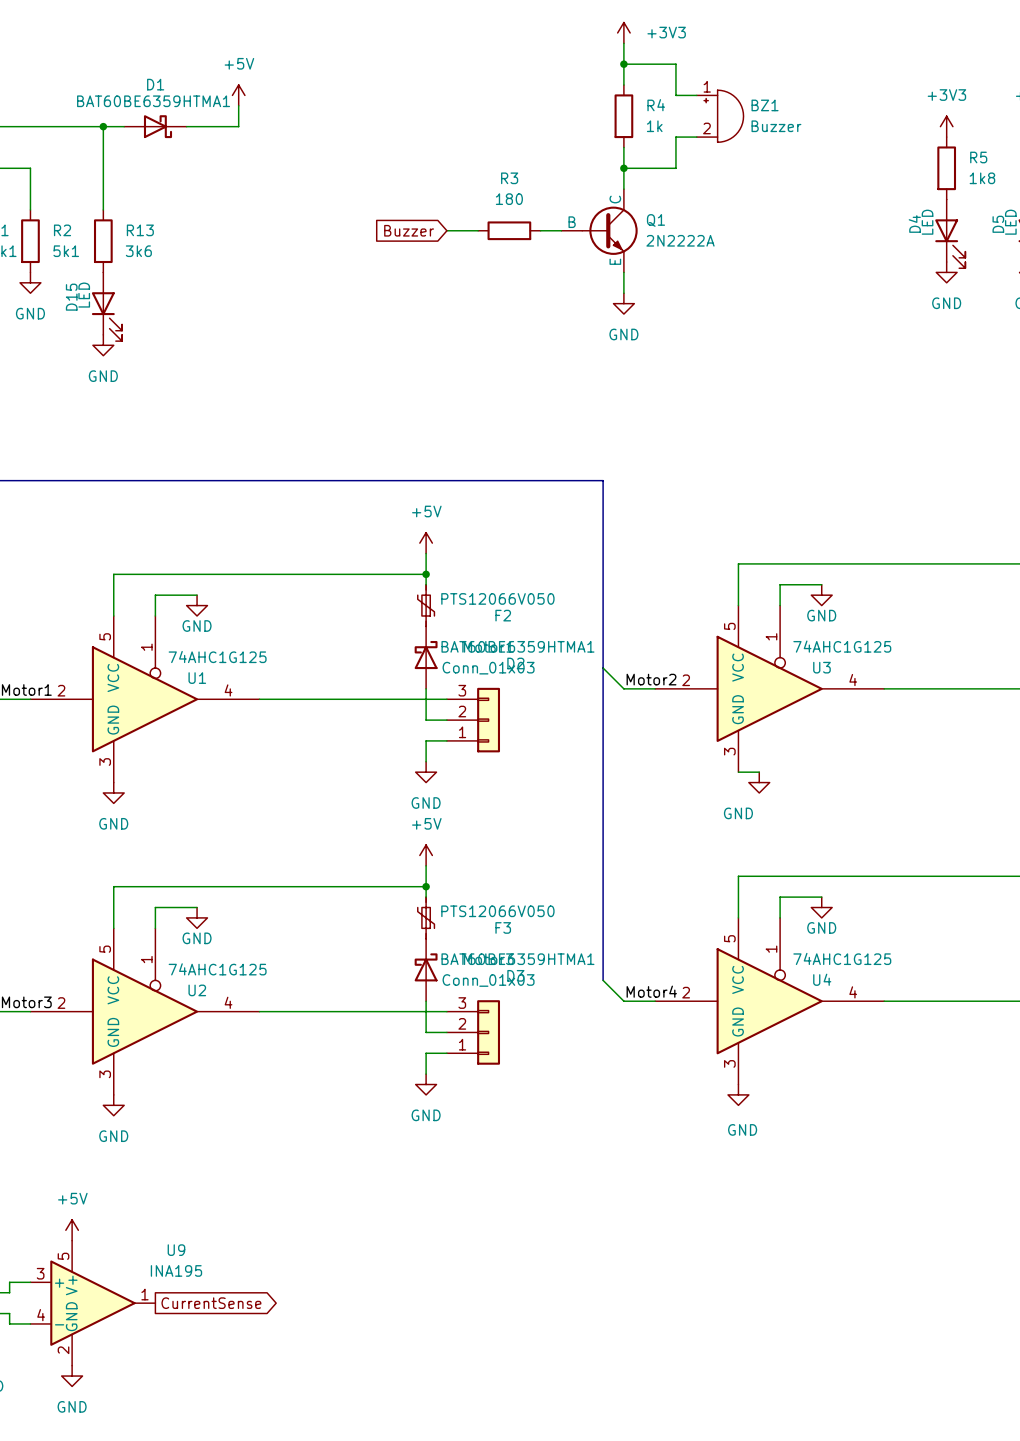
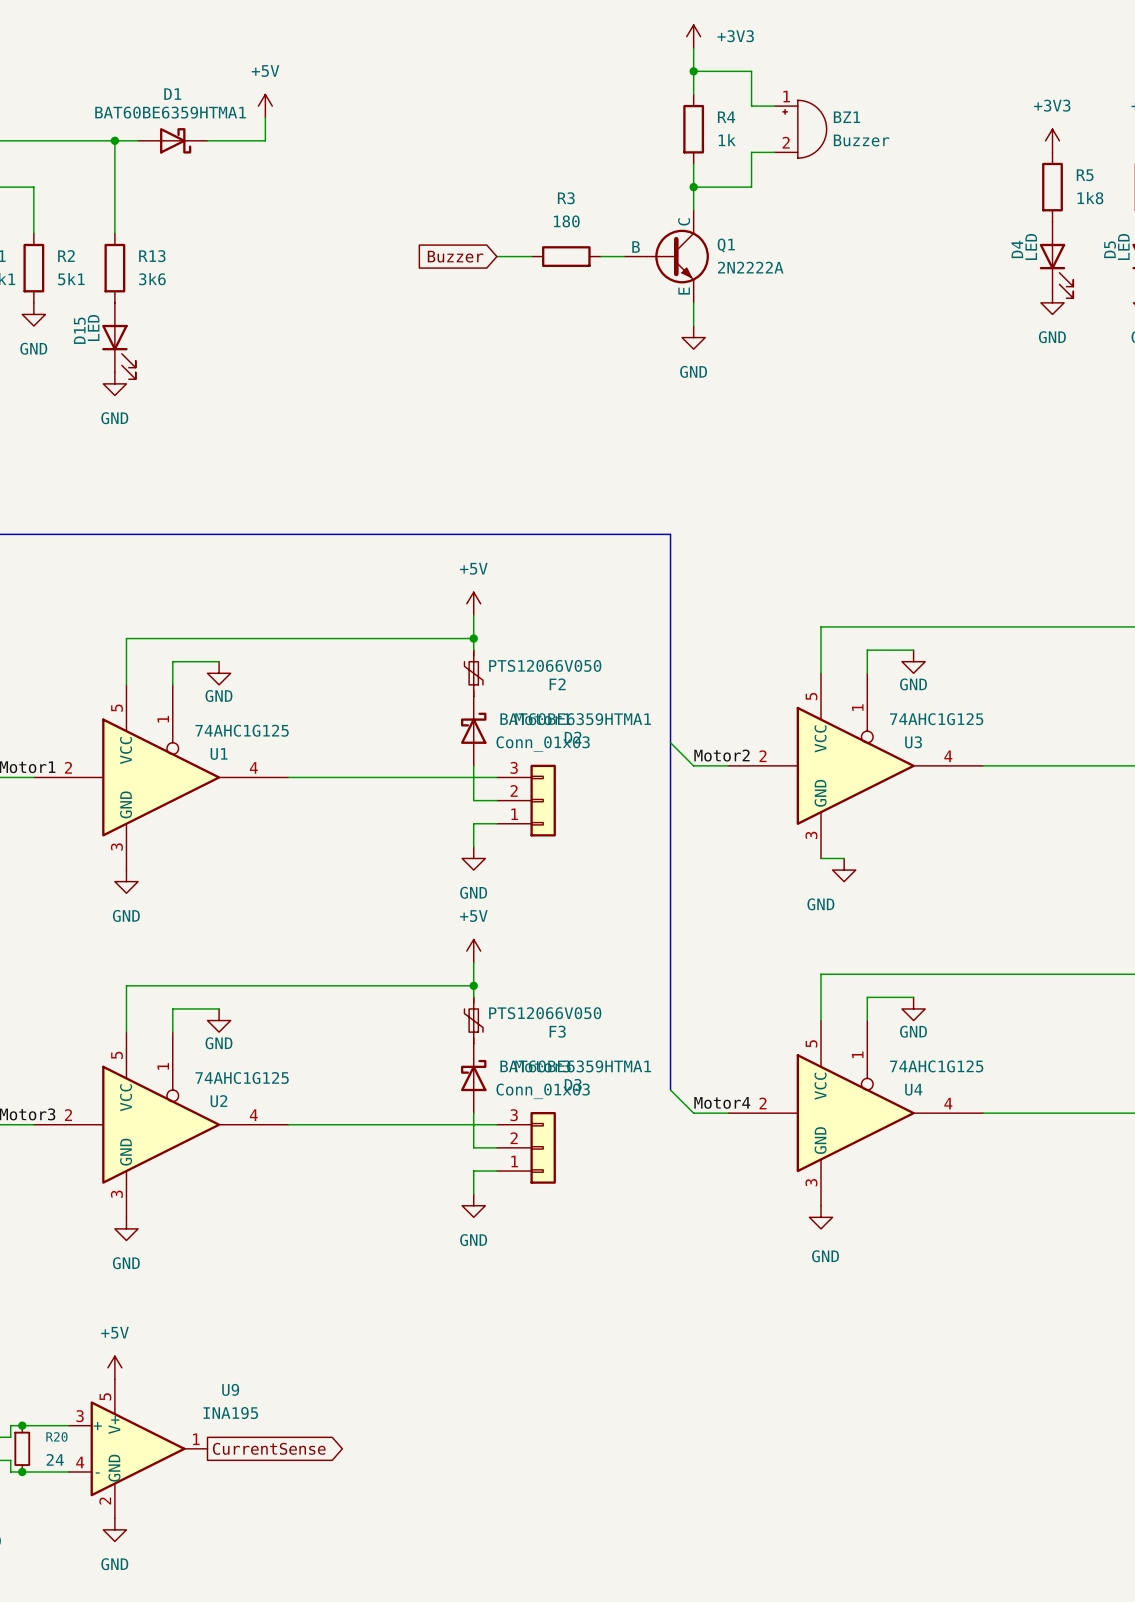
power symbol position: +5V (72, 1230) -> +5V (114, 1367)
junction: none -> (22, 1425)
R20: none -> 24 (22, 1448)
U9 position: (92, 1303) -> (138, 1448)
global label position: CurrentSense (211, 1303) -> CurrentSense (269, 1448)
junction: none -> (22, 1471)
power symbol position: GND (72, 1376) -> GND (114, 1529)

